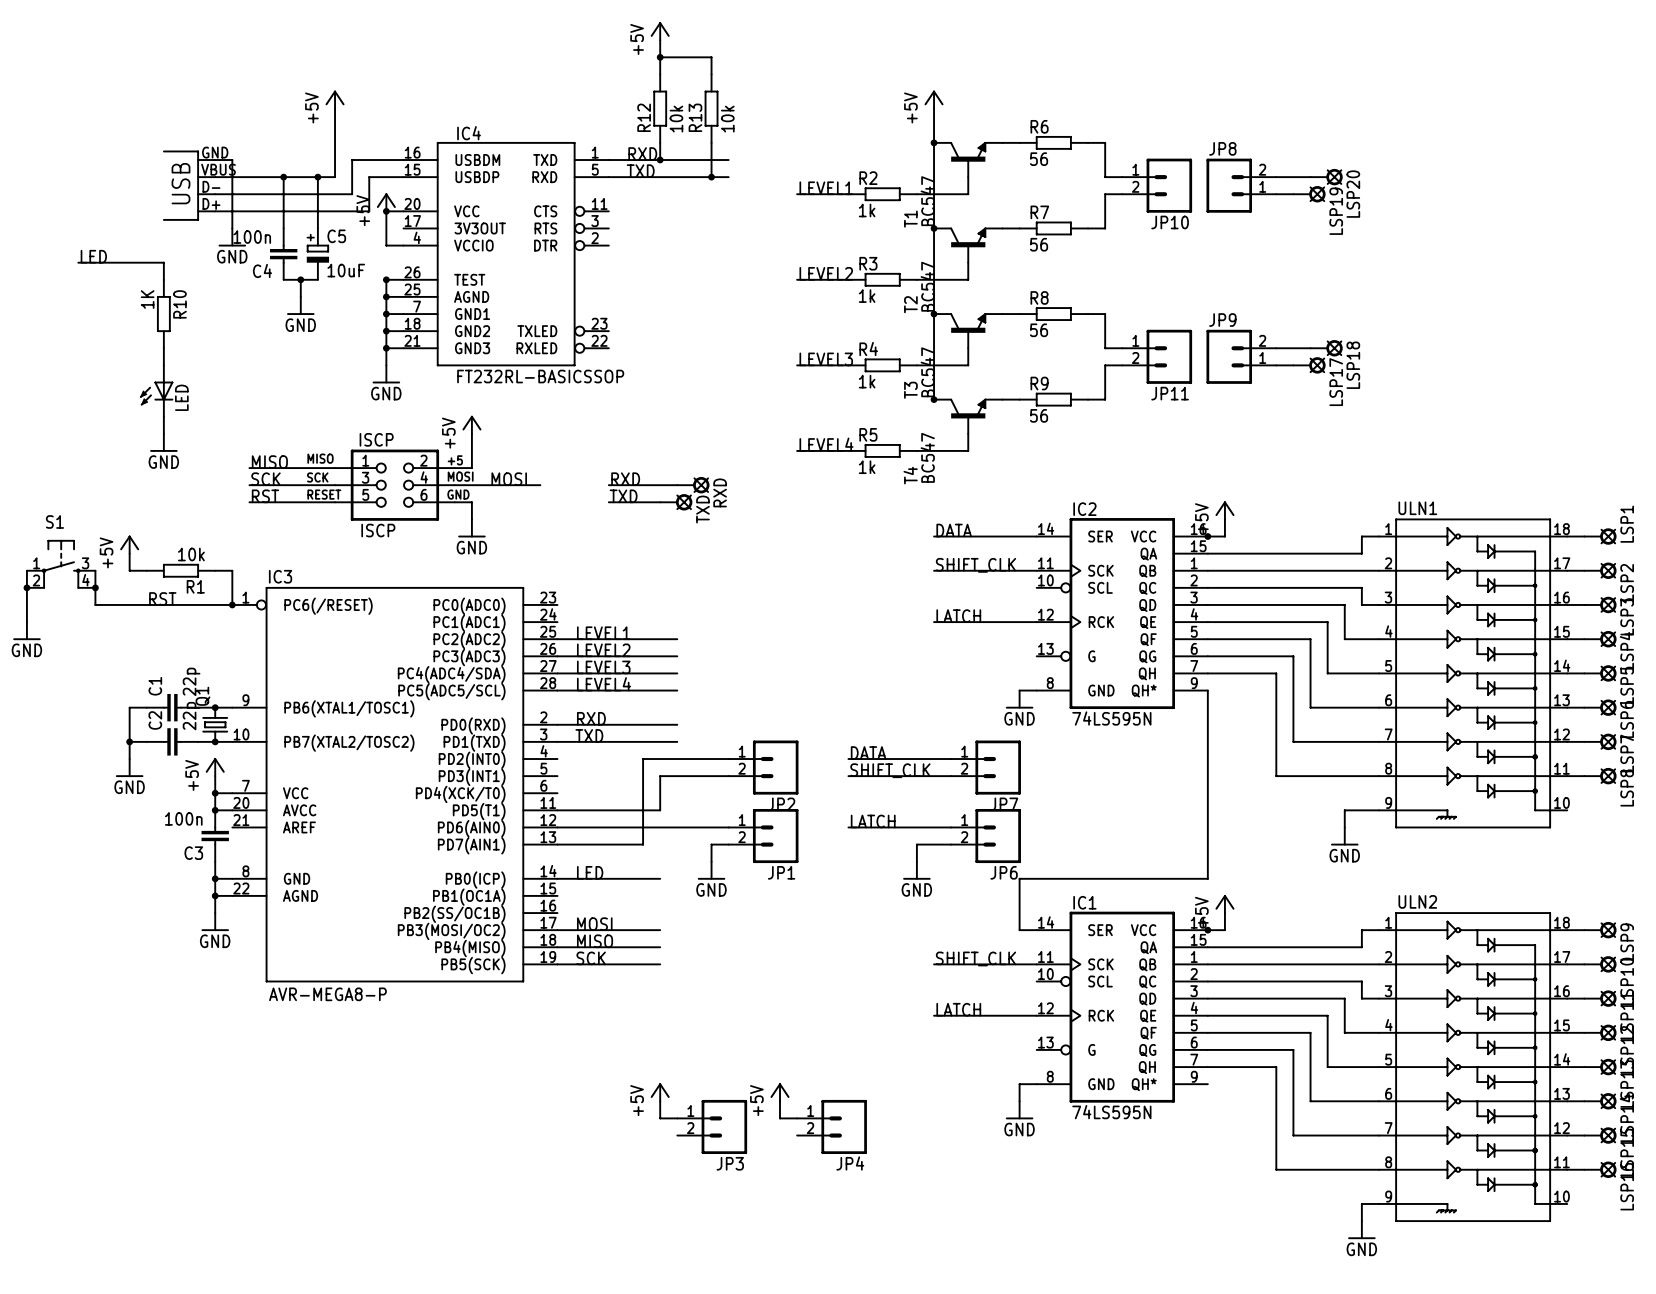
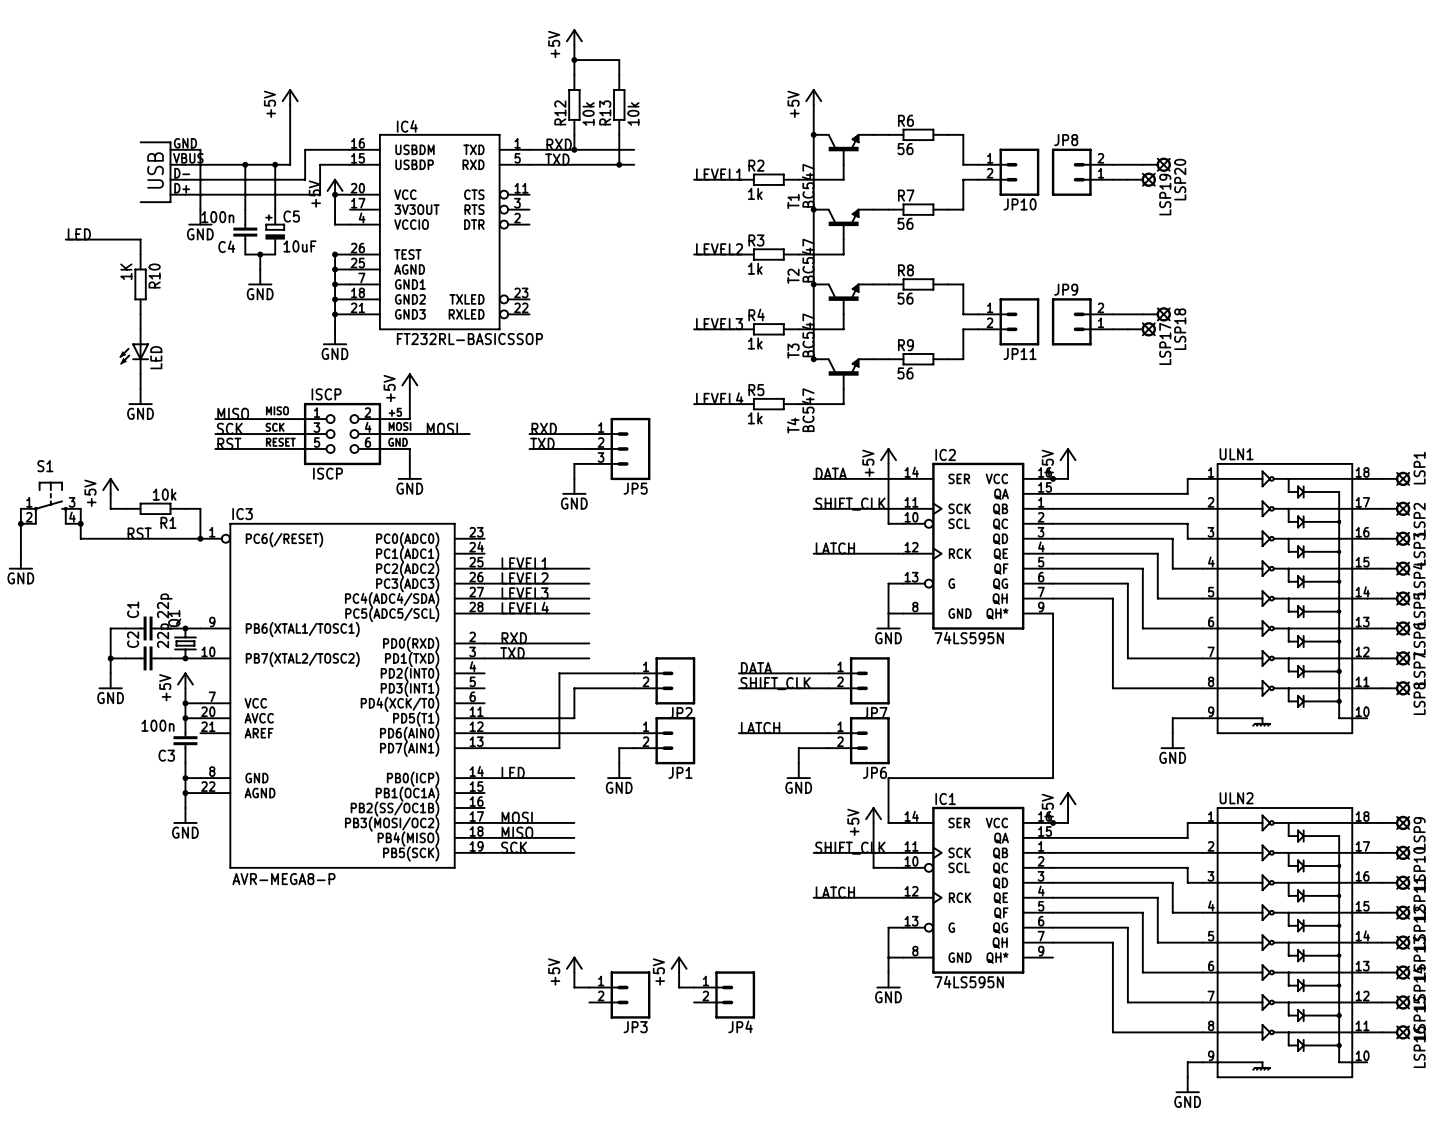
RXD: (693, 485) -> none
TXD: (676, 502) -> none
JP5: none -> (619, 448)
power symbol: none -> +5V (888, 456)
wire: none -> (589, 463) (574, 463) (574, 478)
wire: none -> (888, 463) (888, 523) (903, 523)
power symbol: none -> GND (574, 486)
wire: none -> (903, 583) (888, 583) (888, 613)
power symbol: none -> +5V (873, 815)
wire: none -> (873, 822) (873, 867) (903, 867)
wire: none -> (903, 927) (888, 927) (888, 957)

